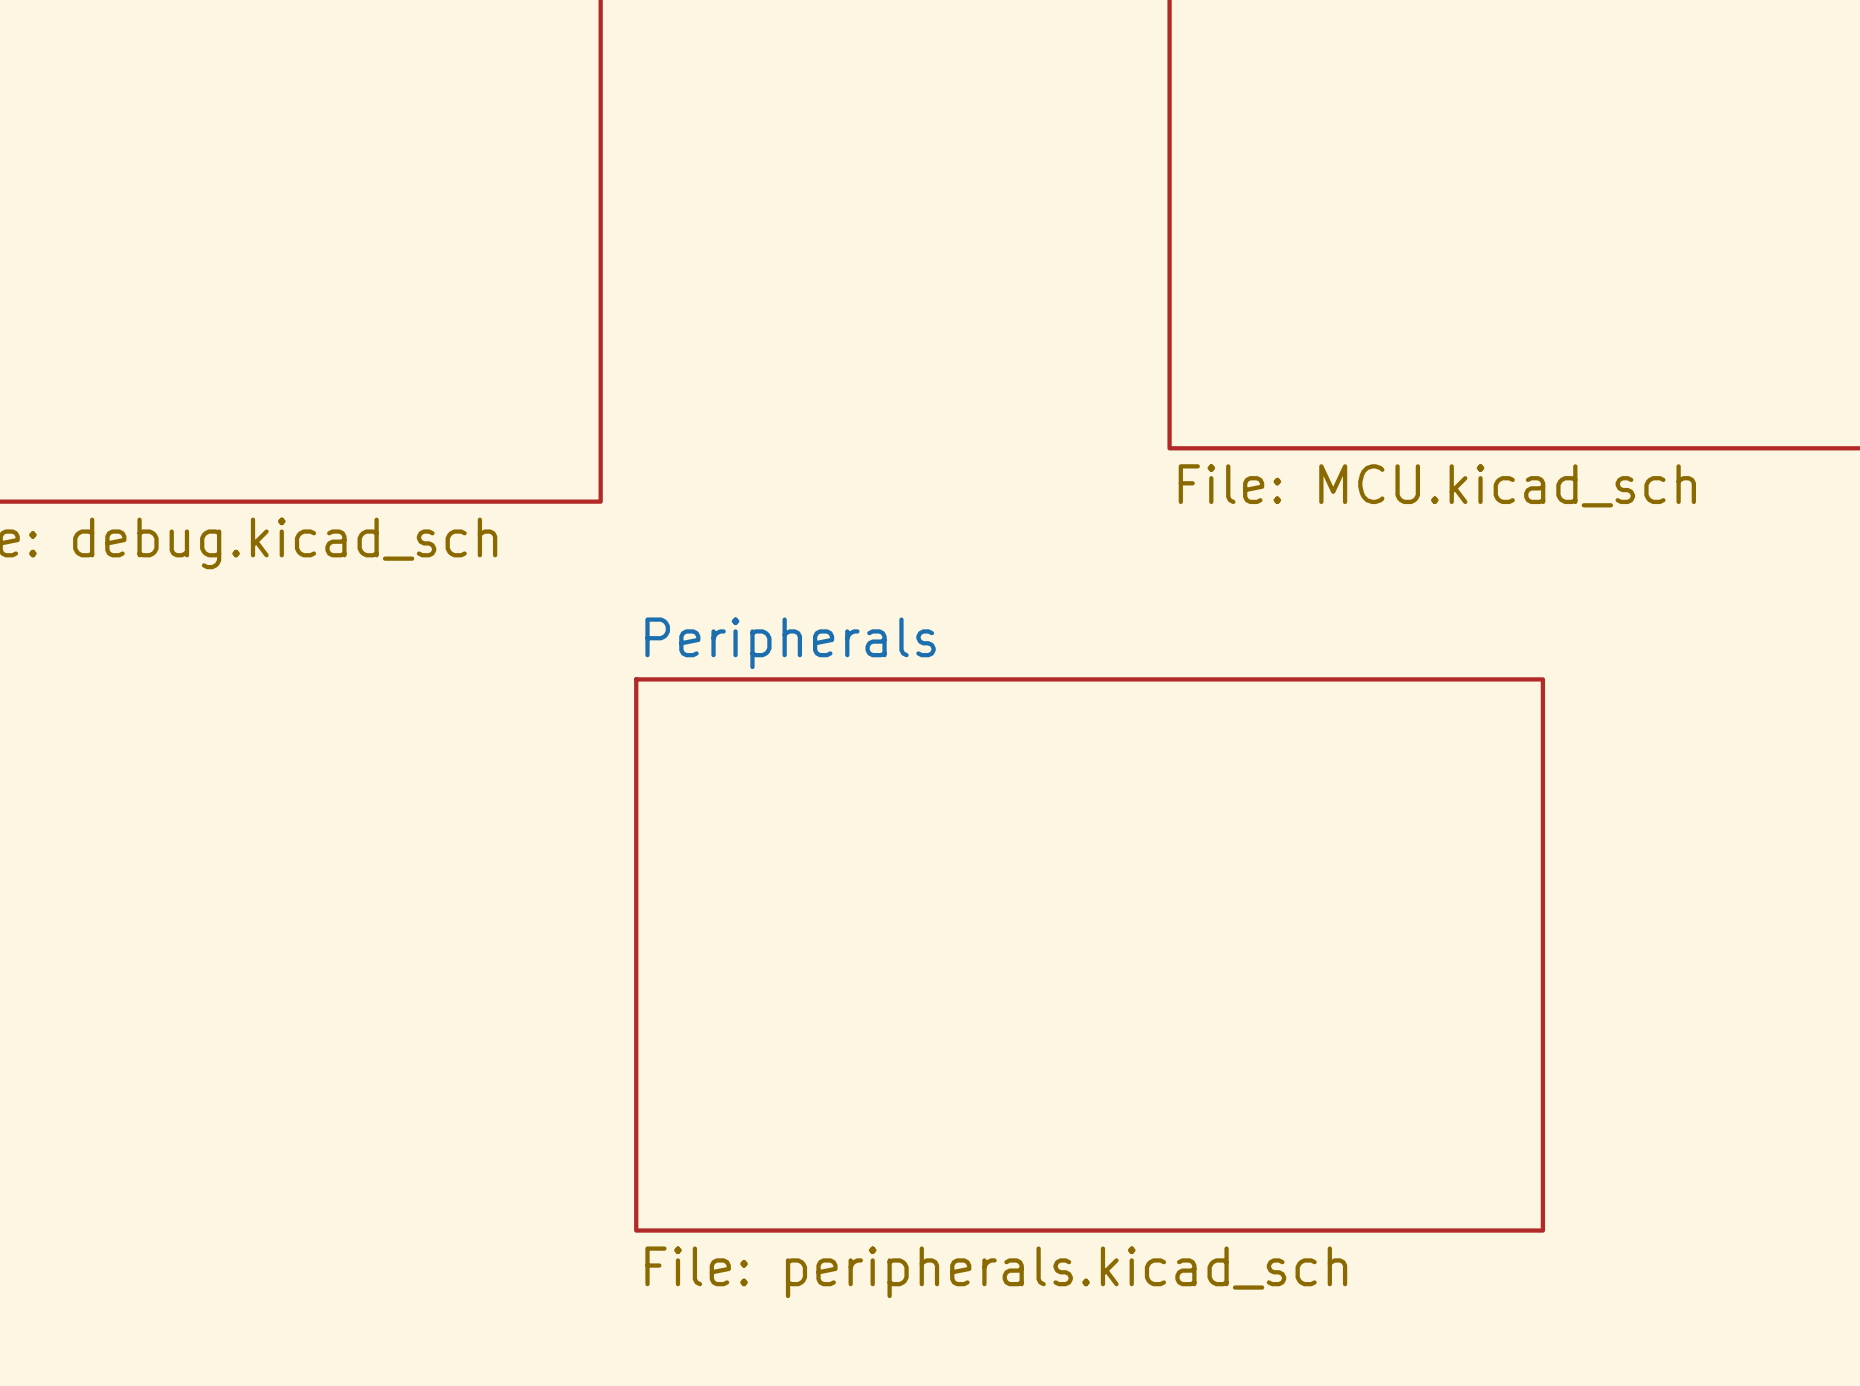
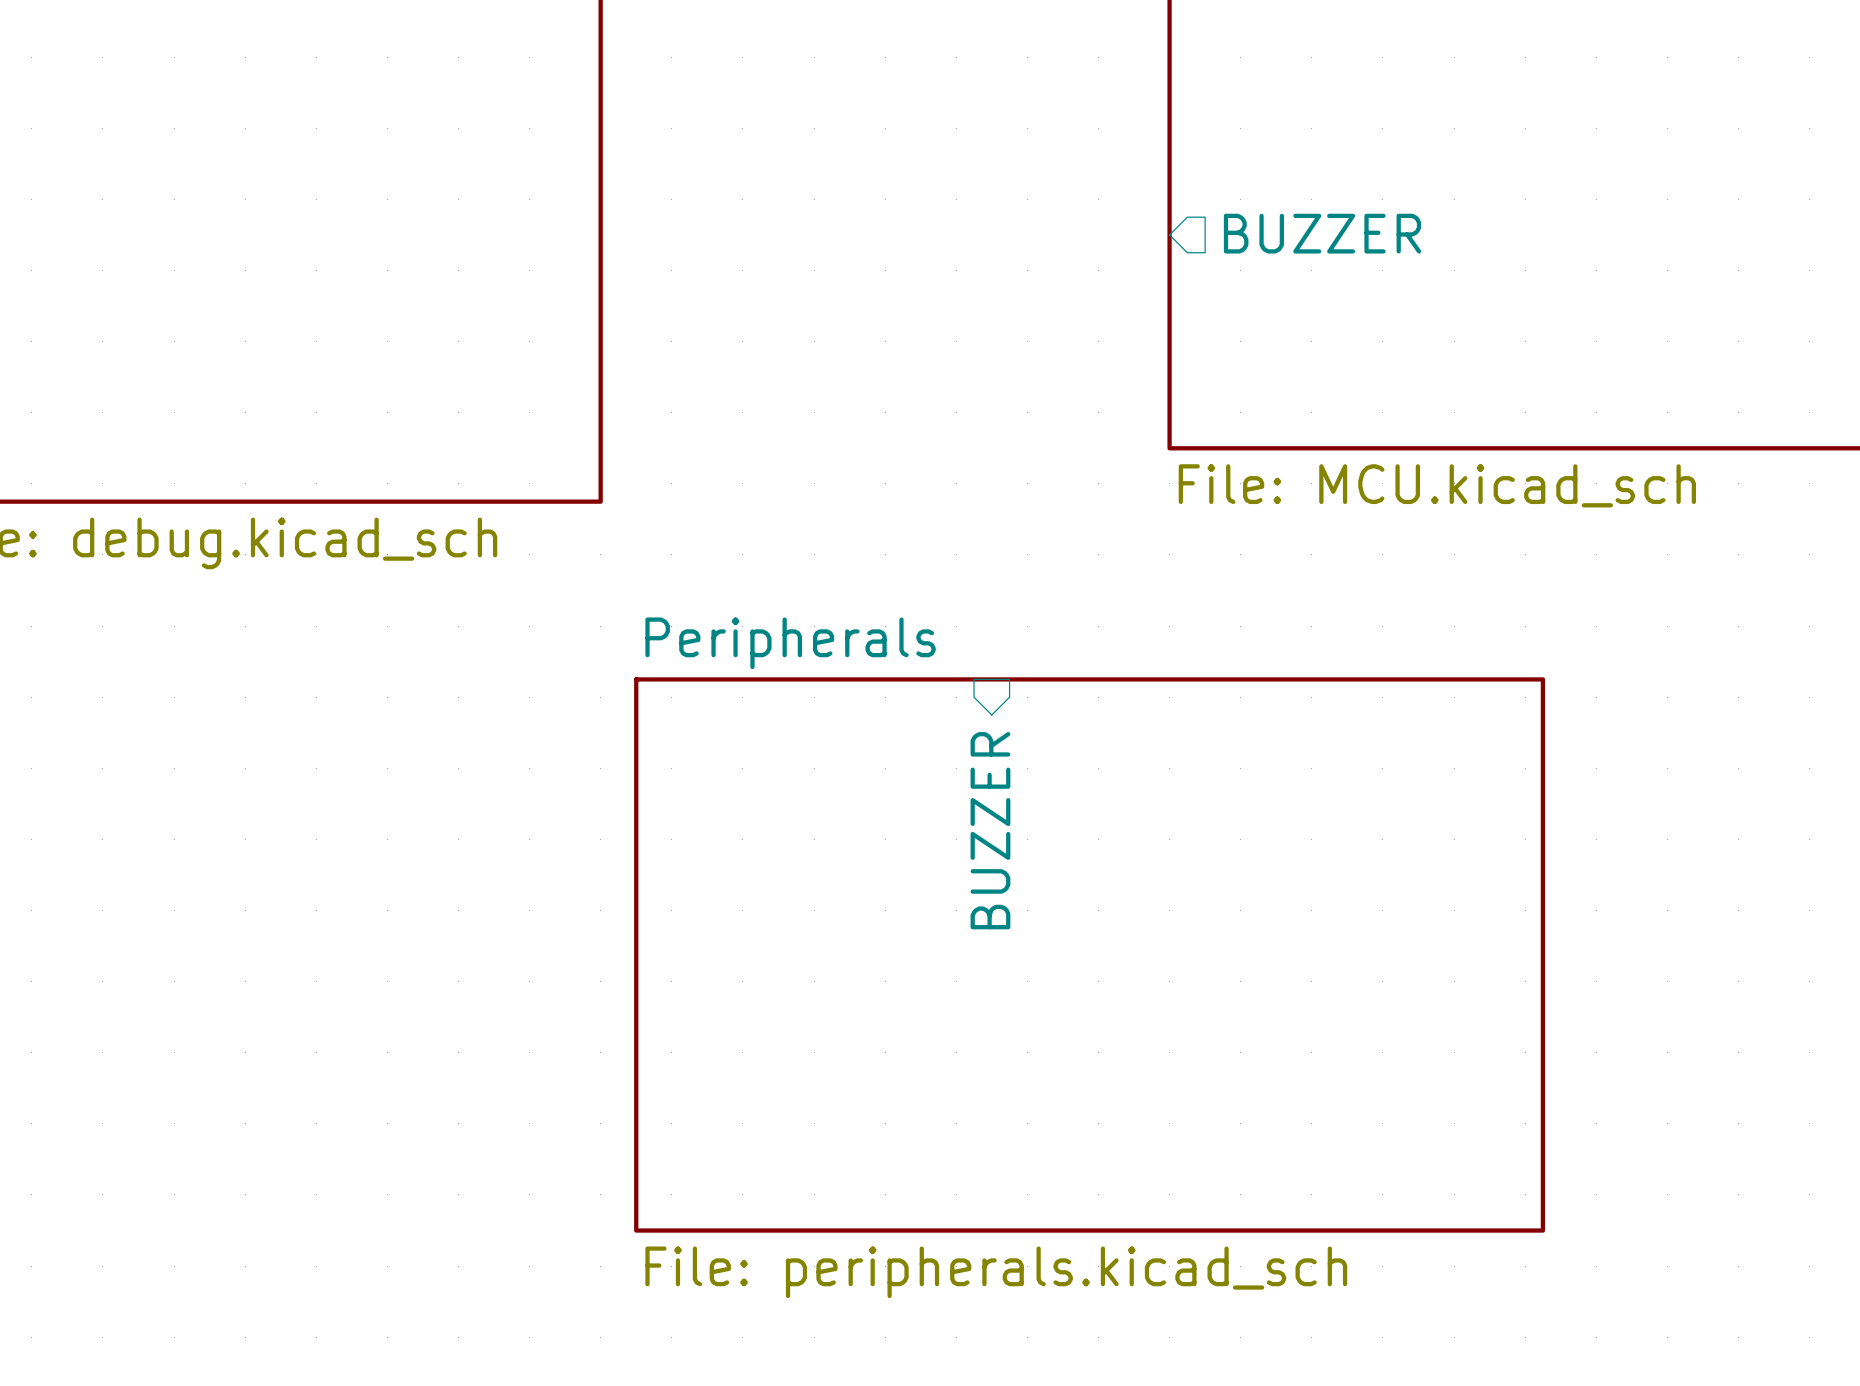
sheet pin: none -> BUZZER (1322, 233)
sheet pin: none -> BUZZER (990, 830)

